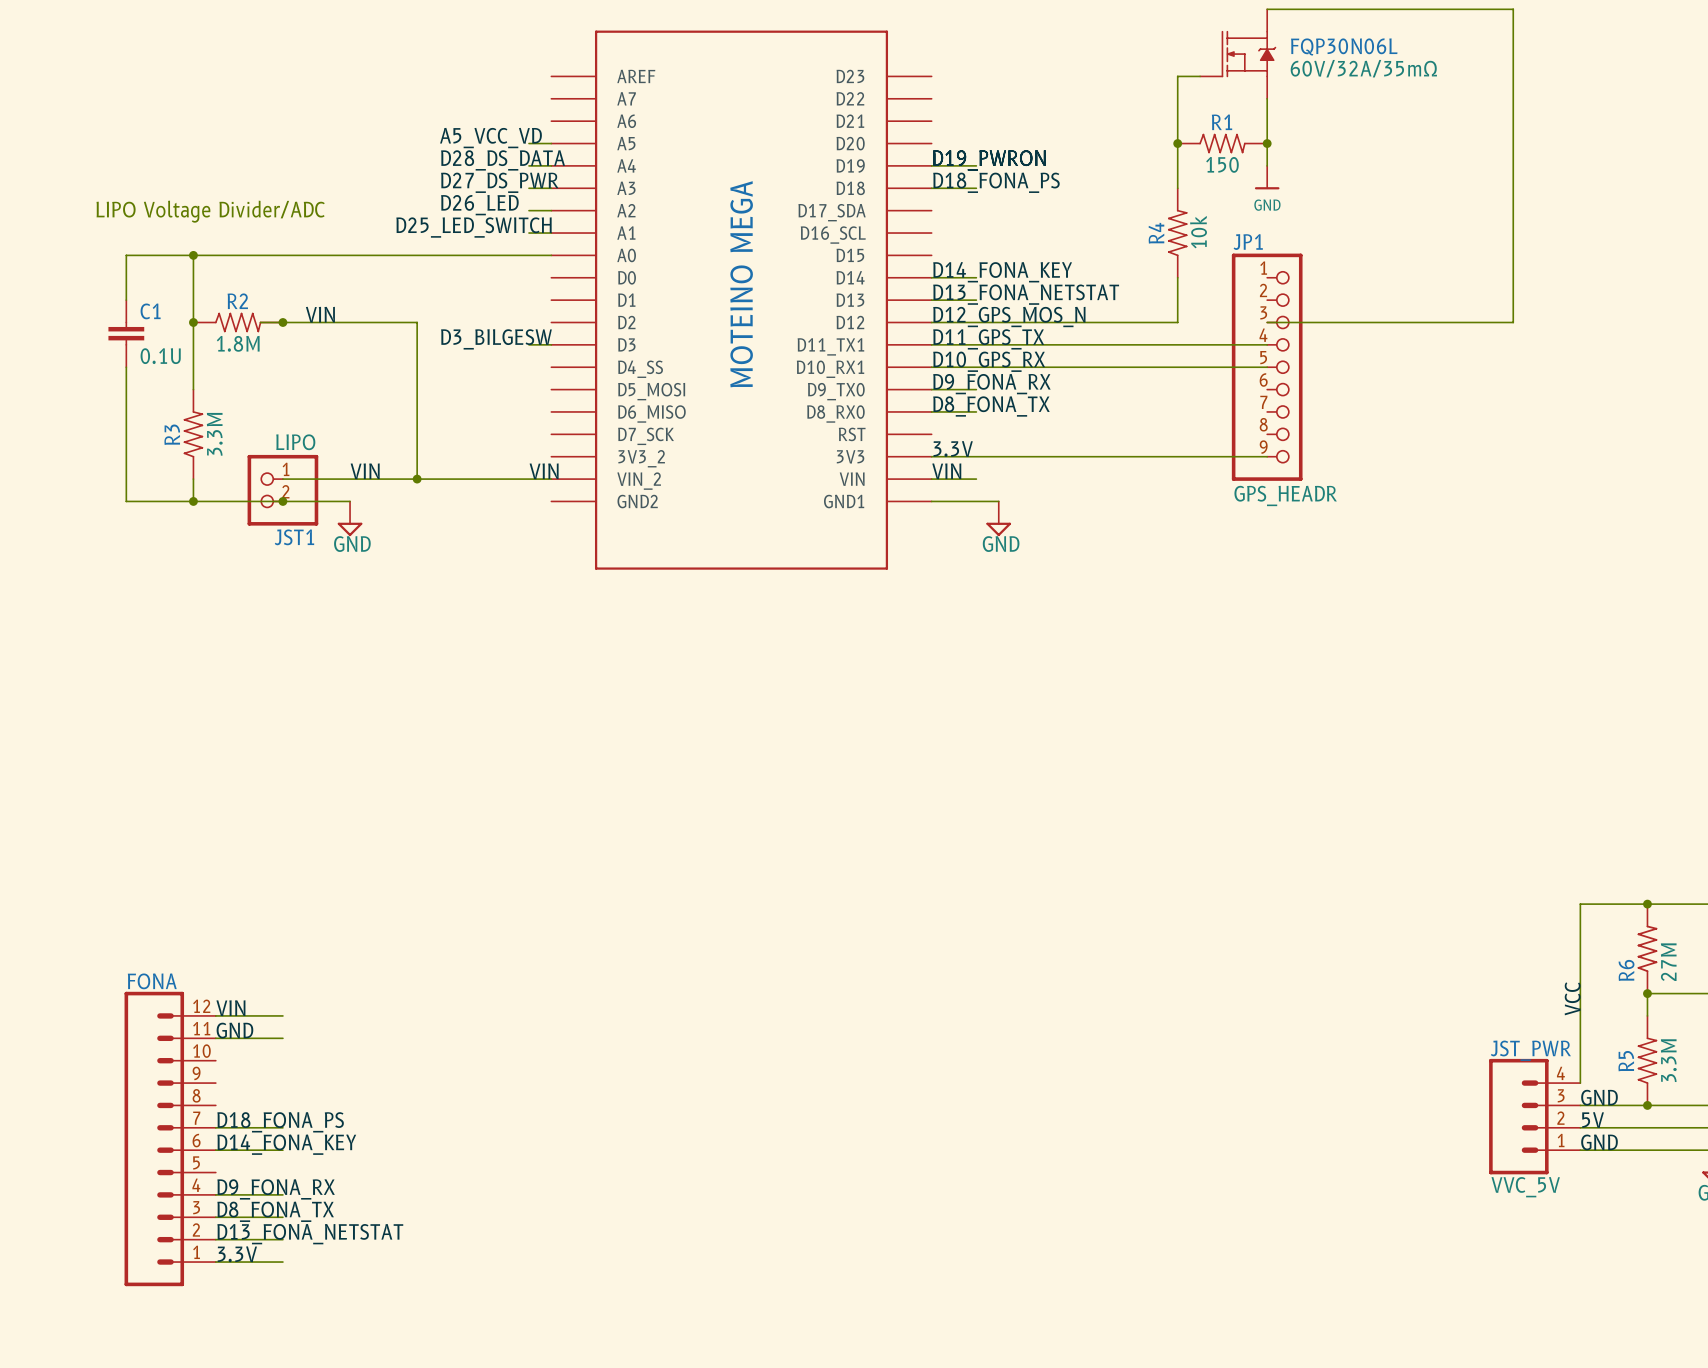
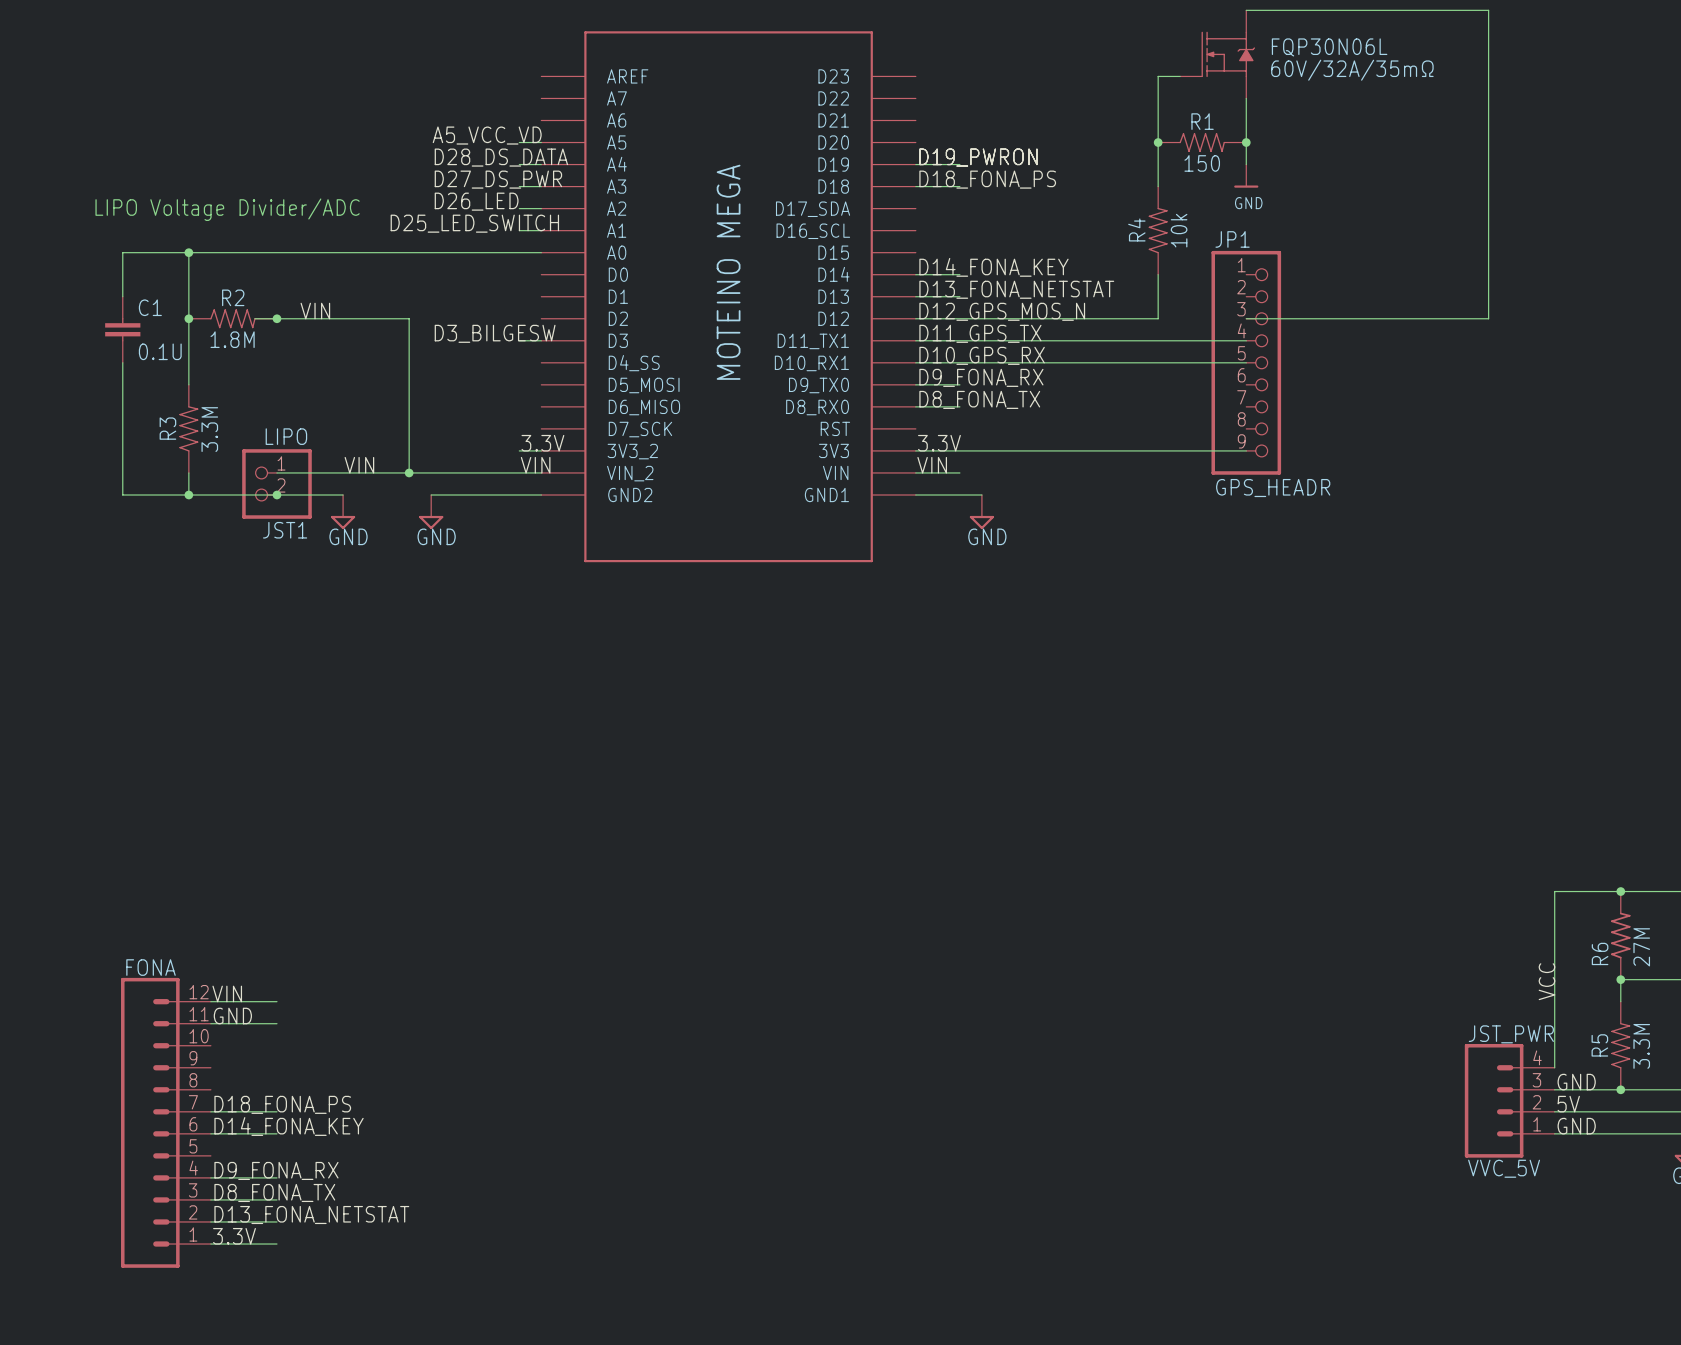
label: none -> 3.3V (542, 443)
wire: none -> (519, 450) (541, 450)
wire: none -> (431, 495) (541, 495)
power symbol: none -> GND (431, 512)

